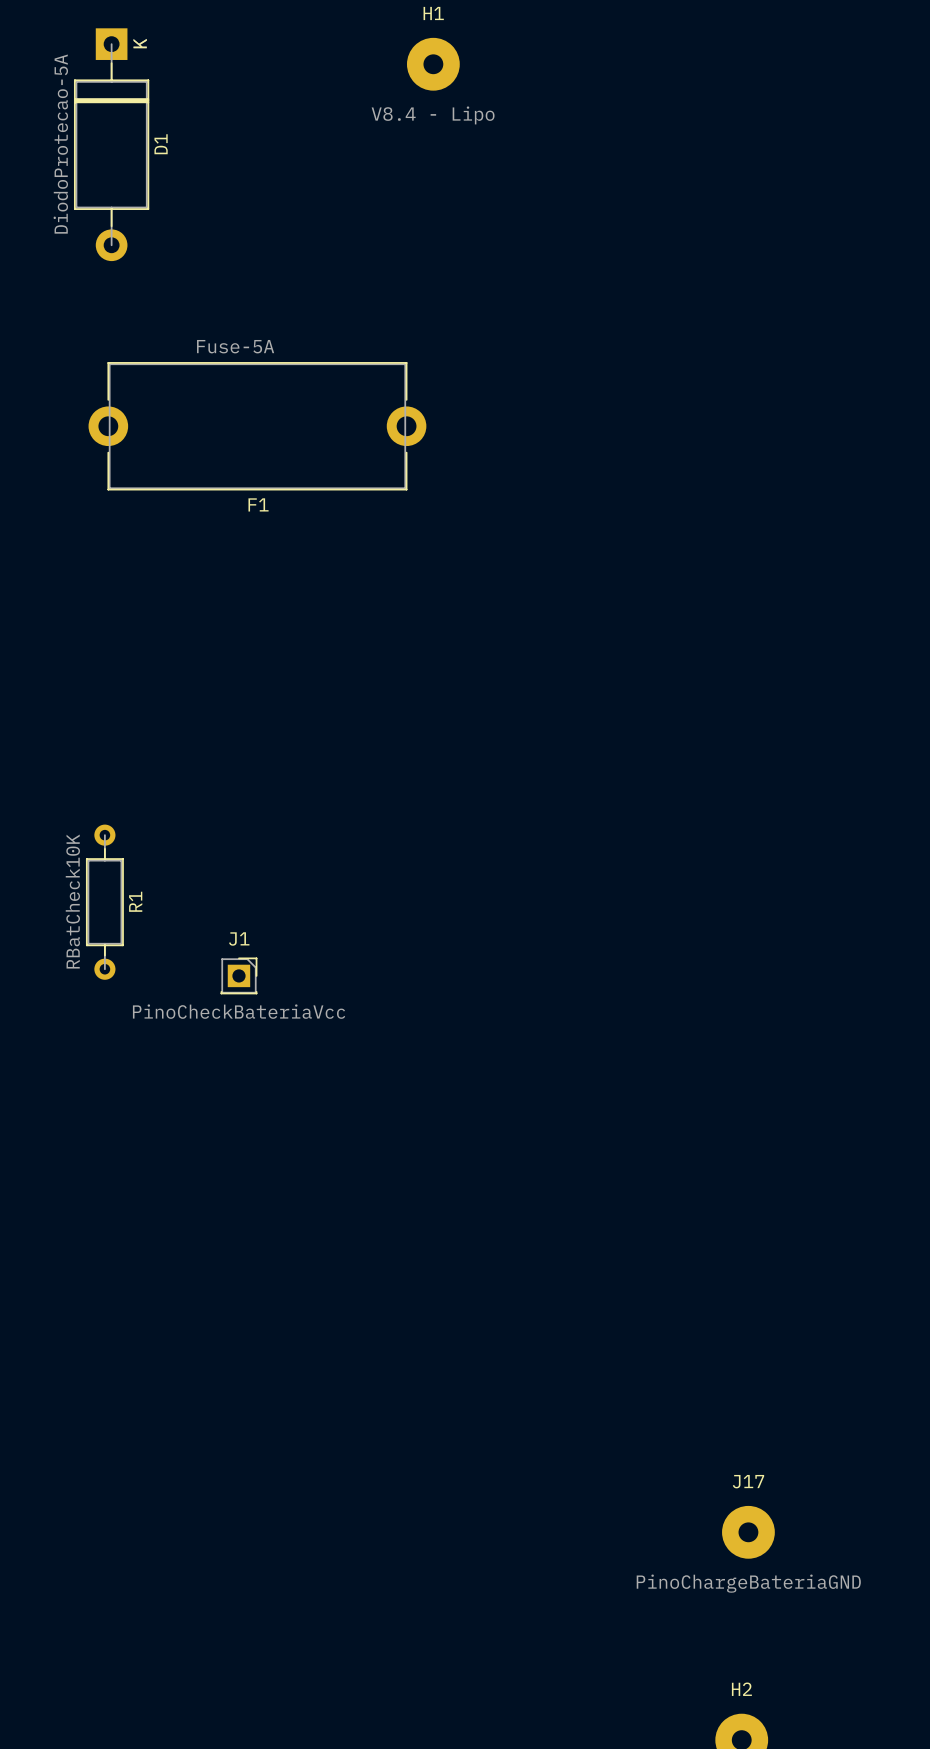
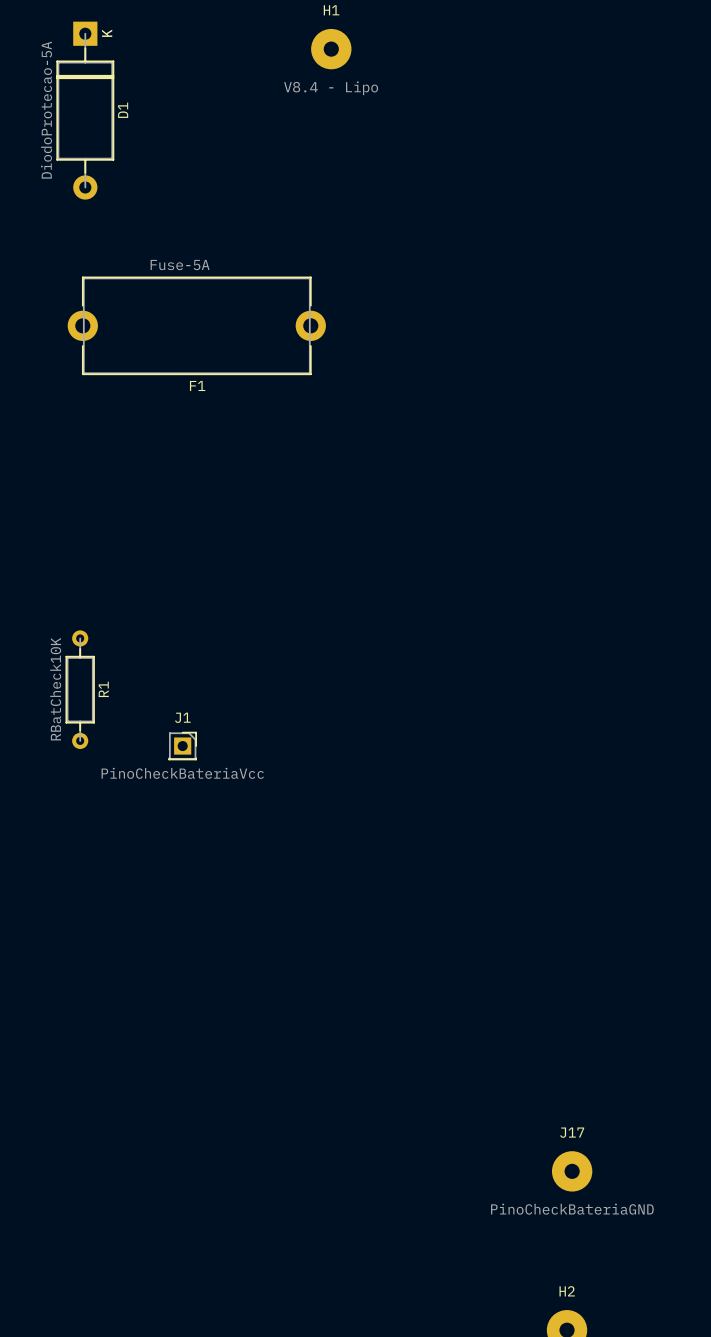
J17 value: PinoChargeBateriaGND (748, 1583) -> PinoCheckBateriaGND (572, 1209)

